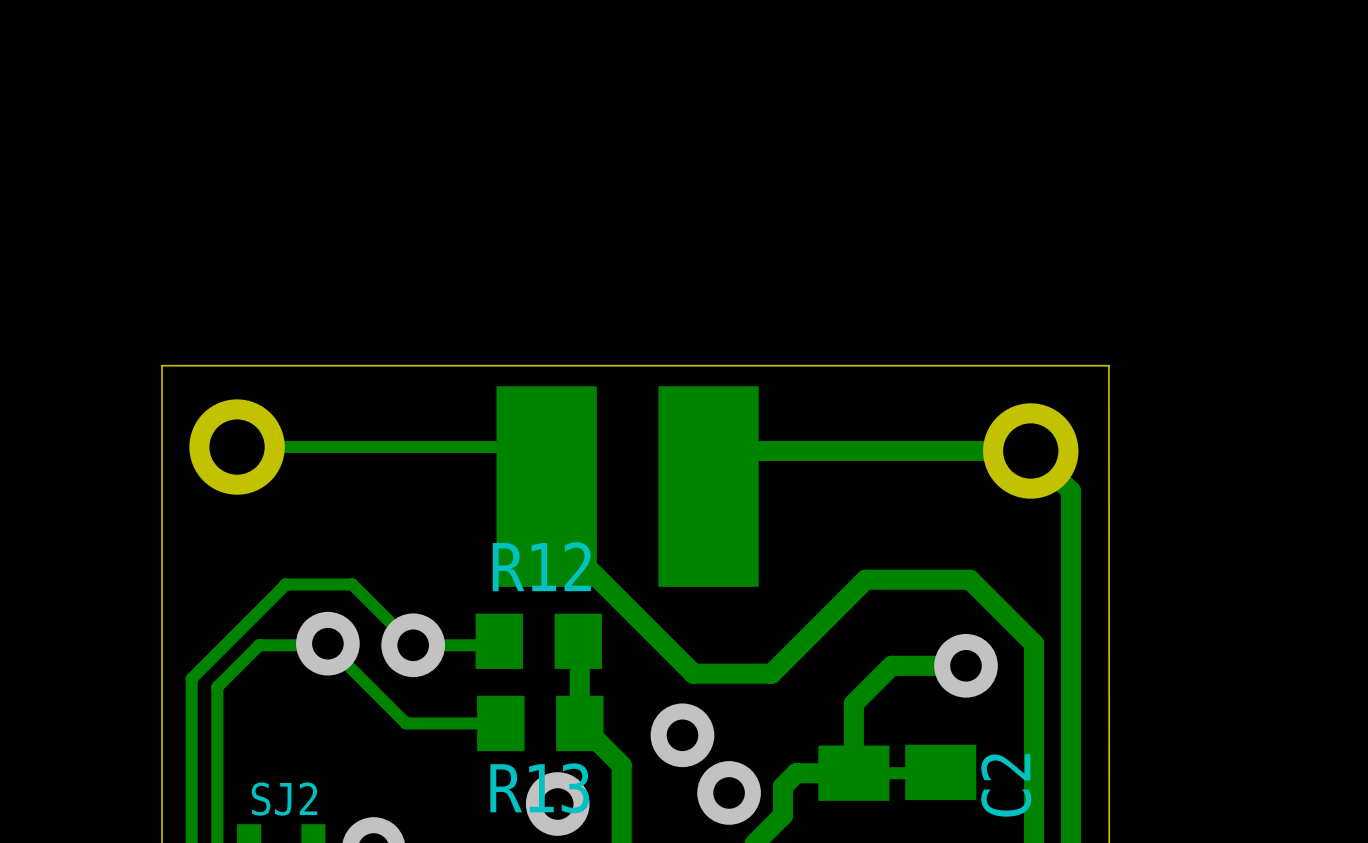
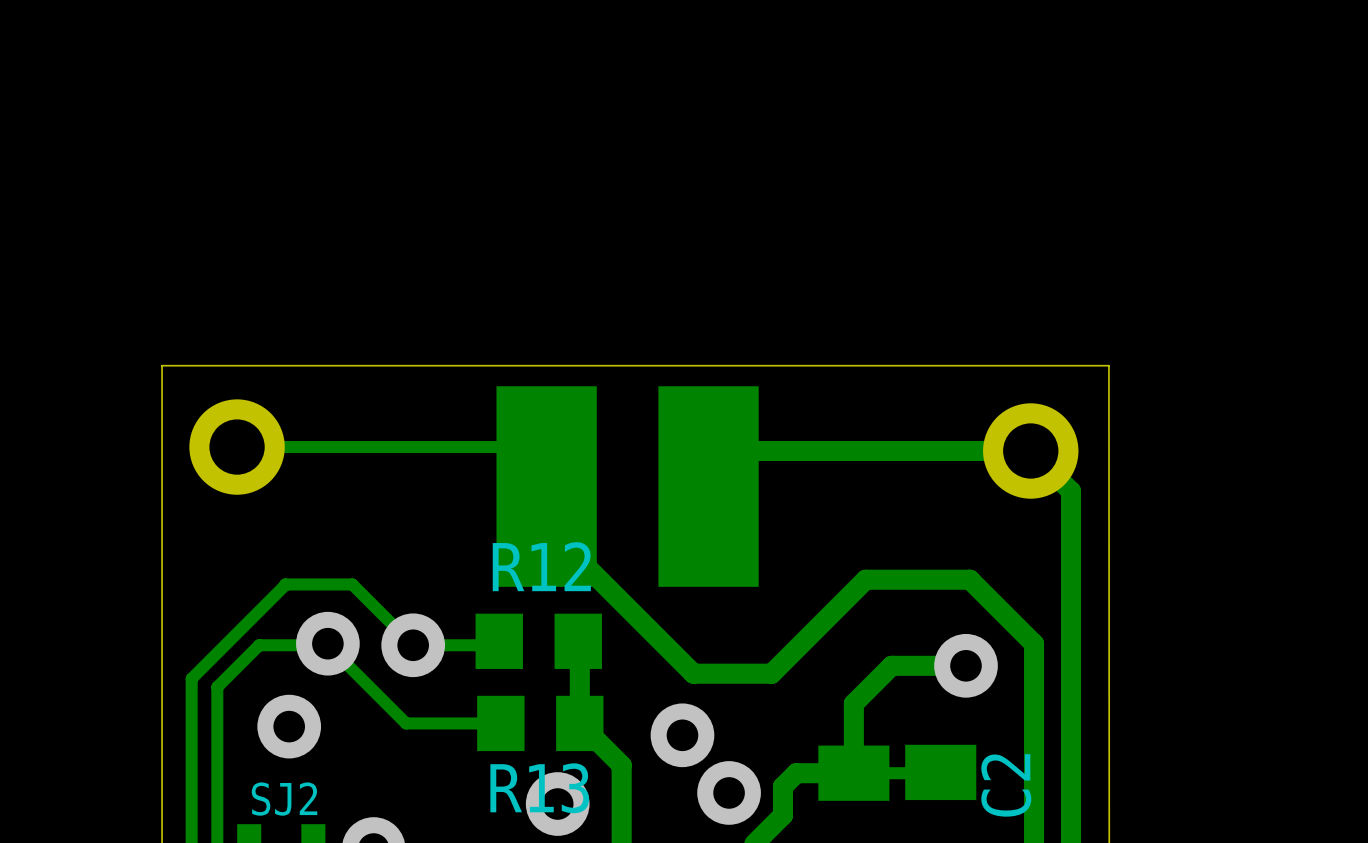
via: none -> (289, 726)

